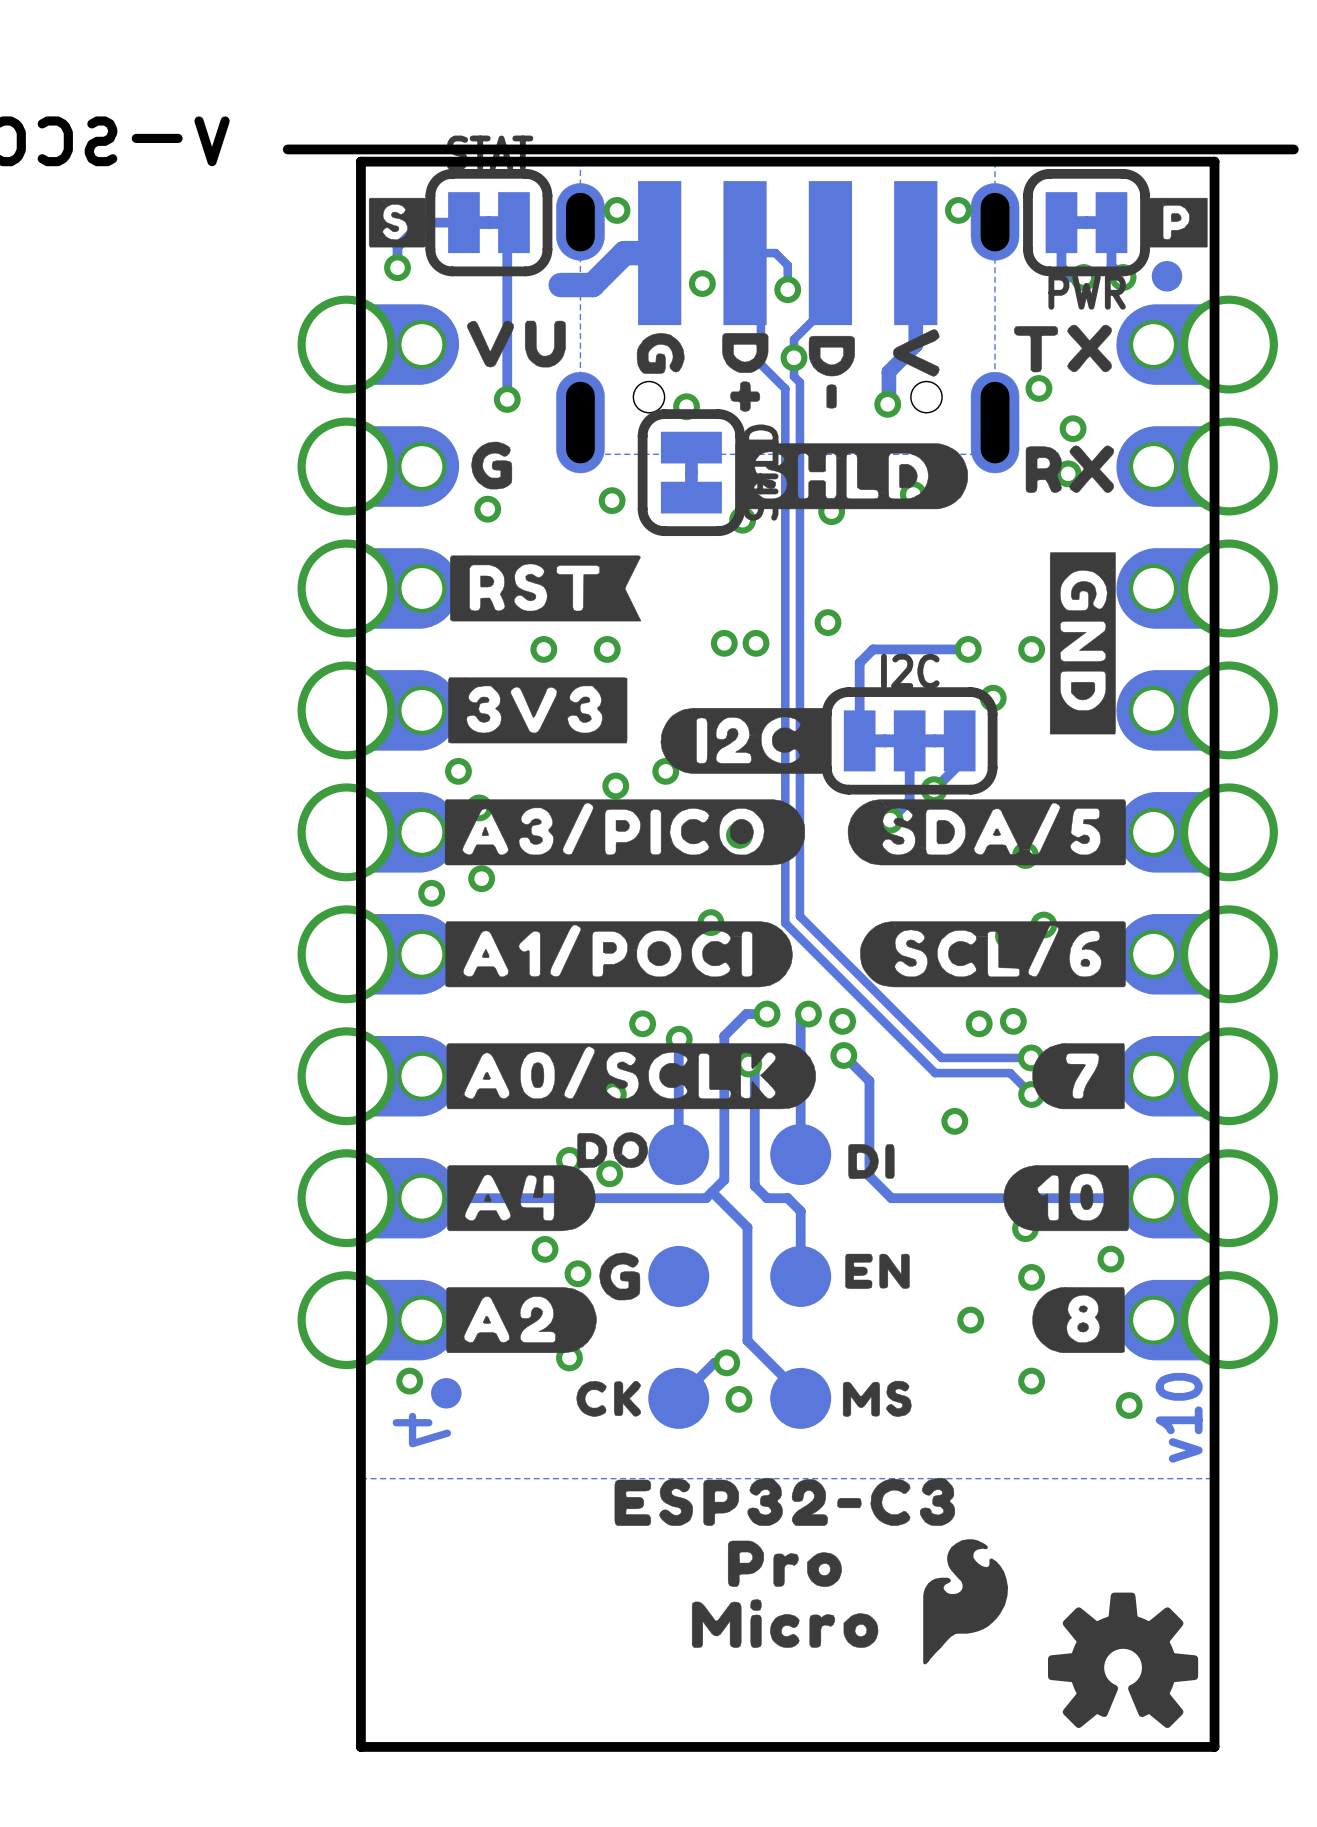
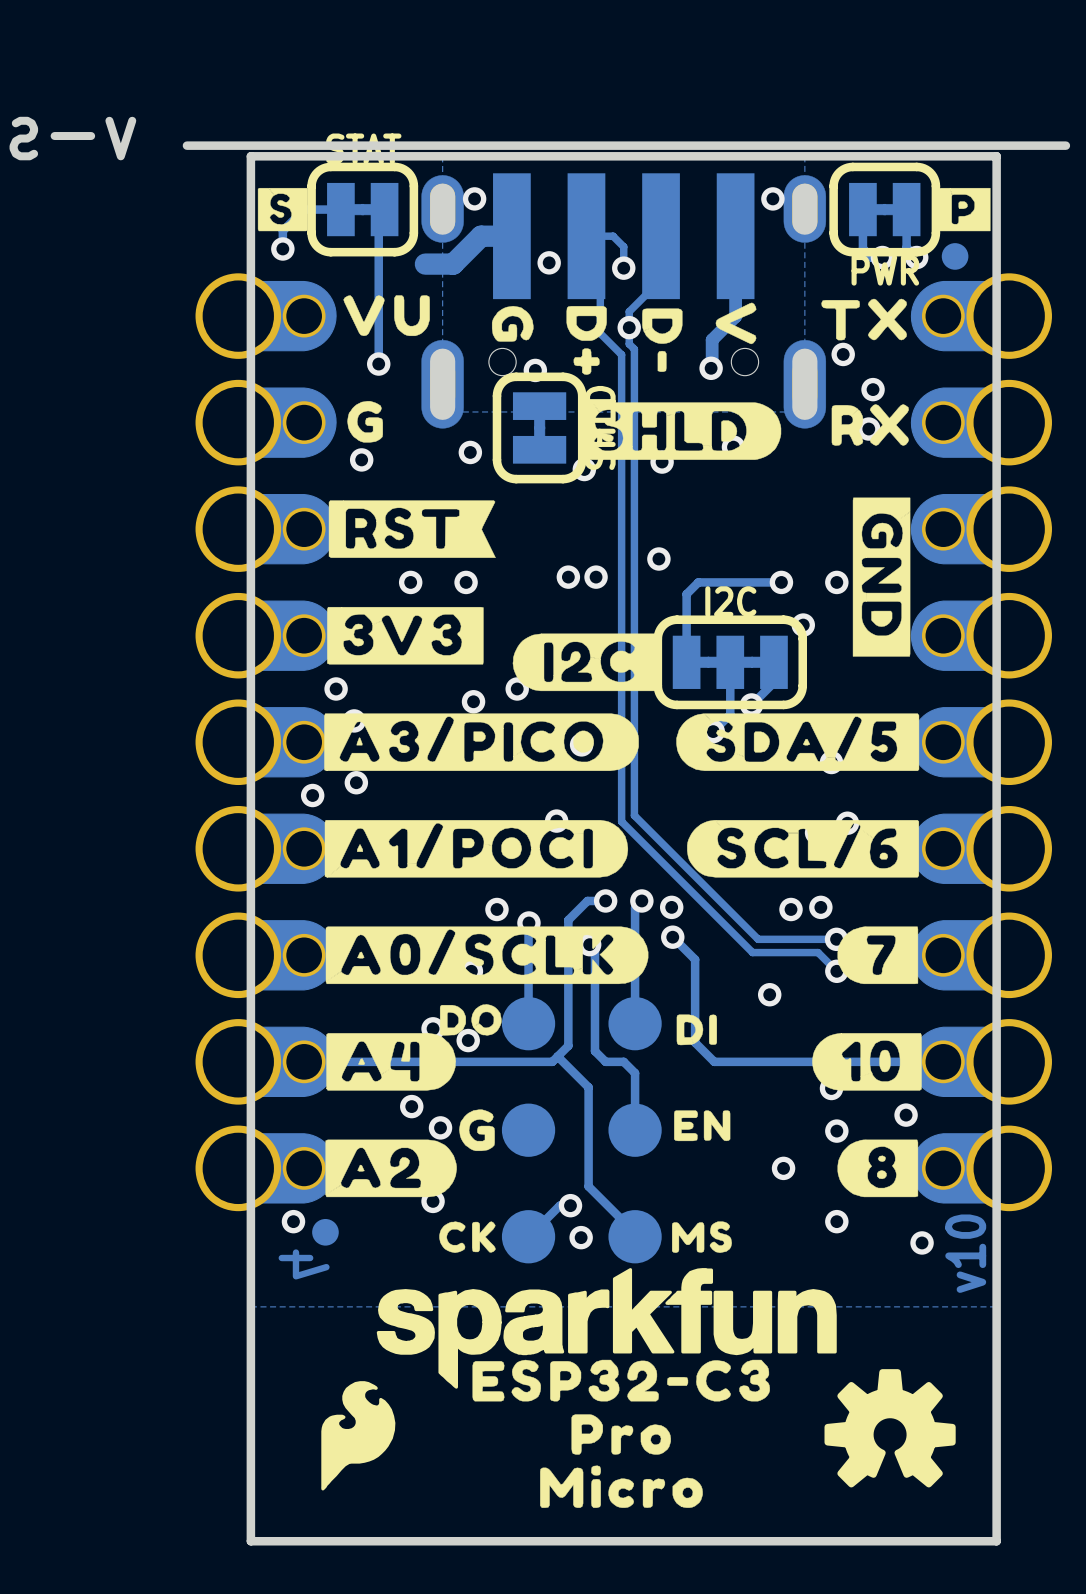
drawing: none -> [376, 1268, 837, 1389]
drawing position: (784, 1502) -> (621, 1380)
drawing position: (784, 1563) -> (621, 1434)
drawing position: (965, 1601) -> (358, 1435)
drawing position: (785, 1623) -> (621, 1486)
drawing position: (1123, 1660) -> (890, 1428)

